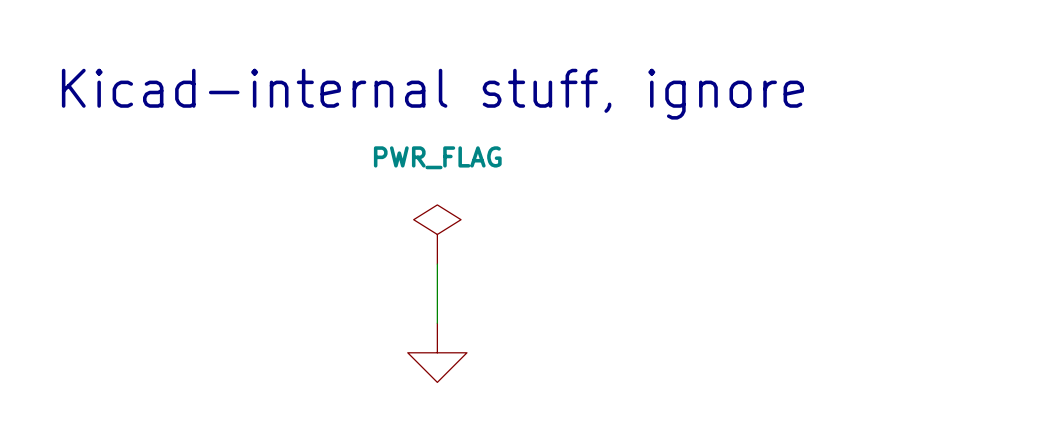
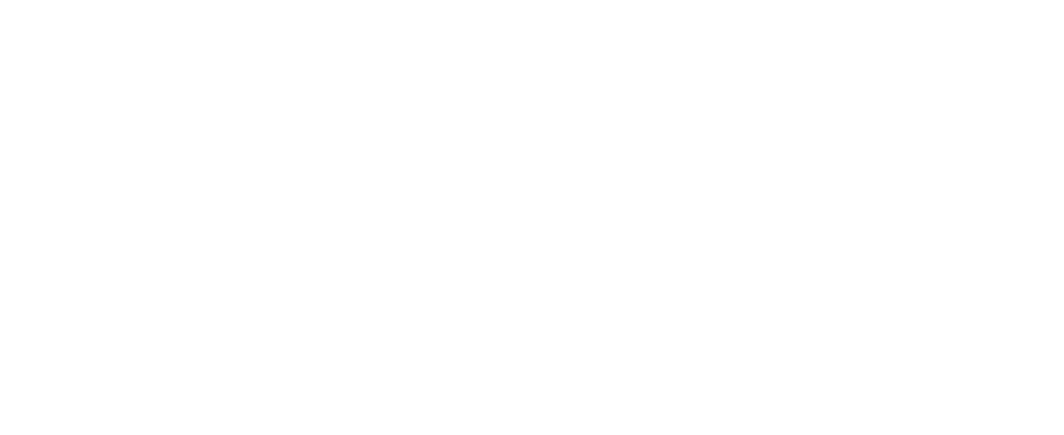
text: Kicad-internal stuff, ignore (432, 94) -> none
power symbol: PWR_FLAG (437, 234) -> none
wire: (437, 264) (437, 323) -> none
power symbol: (437, 352) -> none

